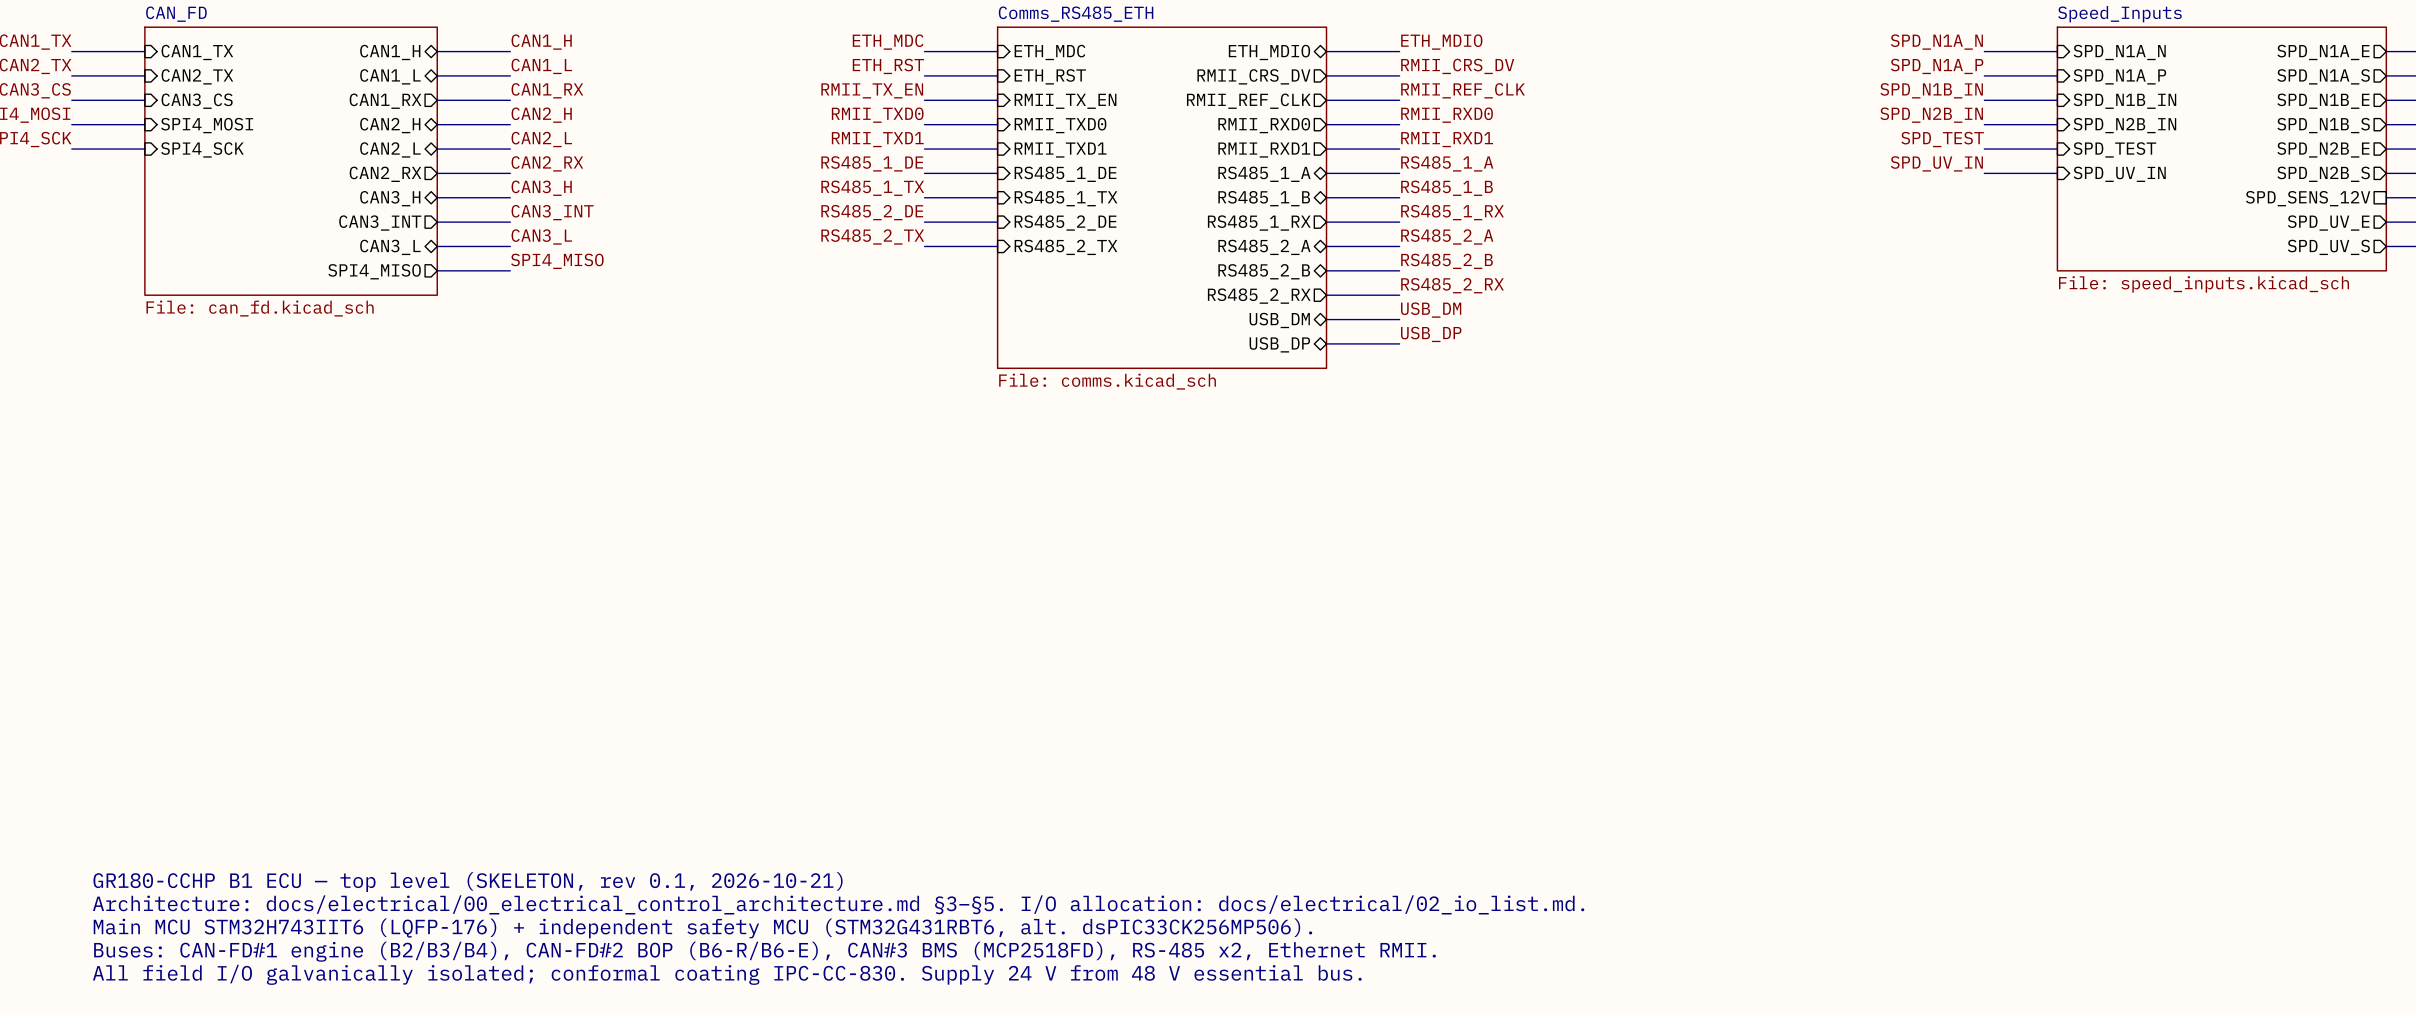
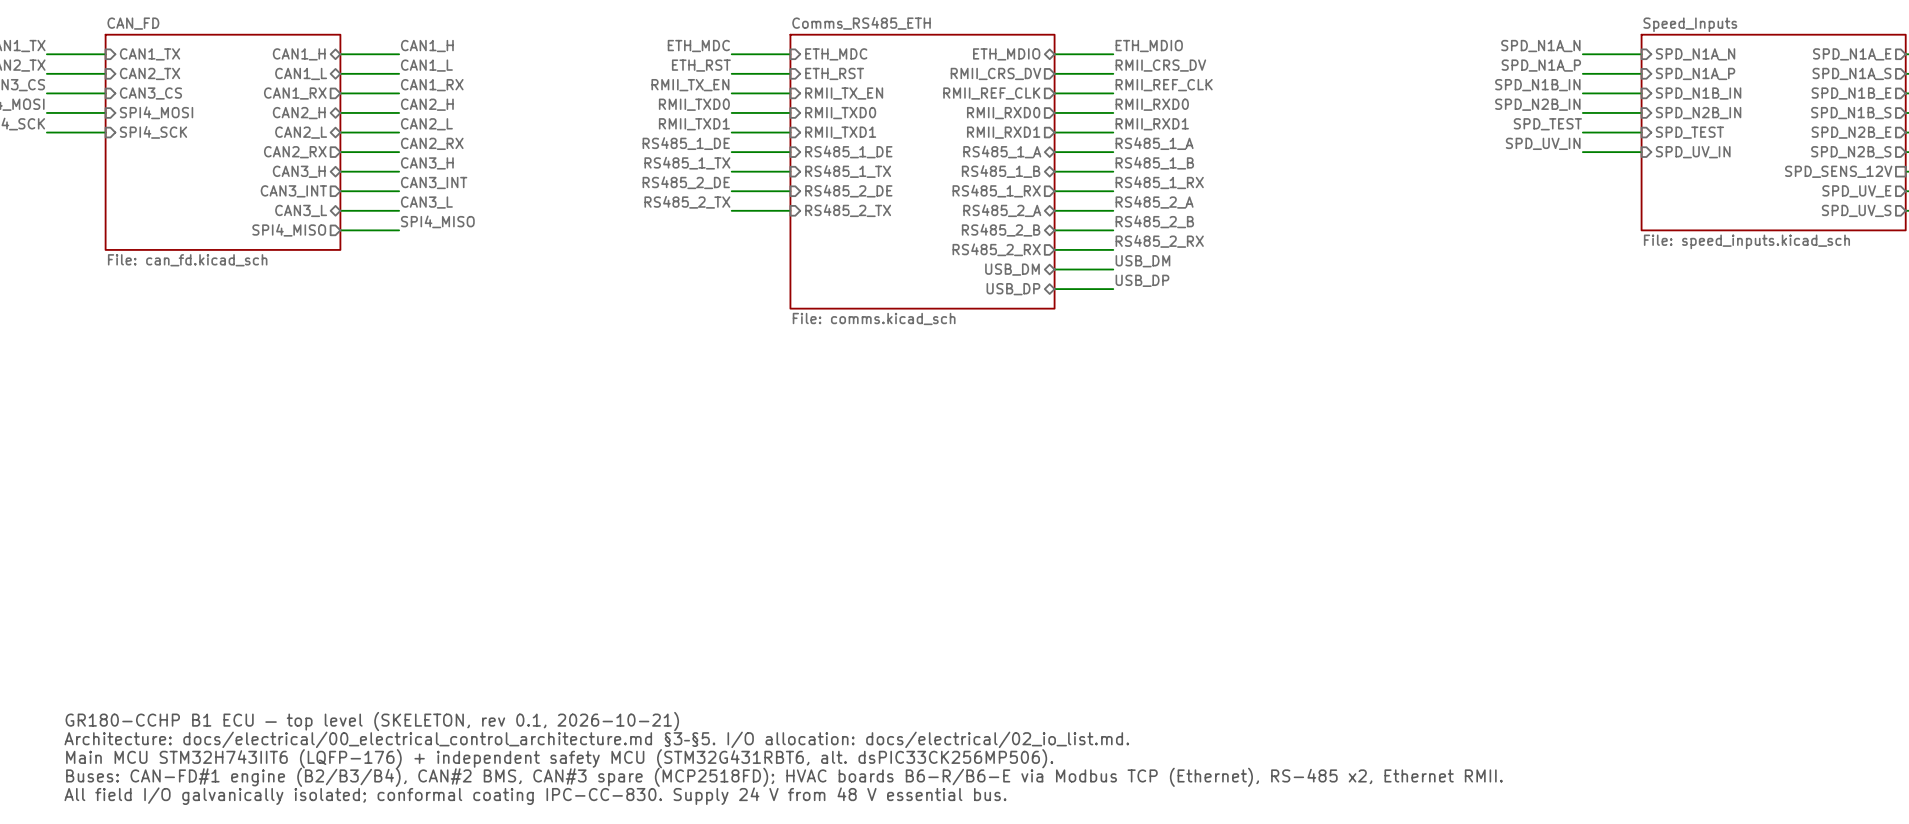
text: Buses: CAN-FD#1 engine (B2/B3/B4), CAN-FD#2 BOP (B6-R/B6-E), CAN#3 BMS (MCP2518FD), RS-485 x2, Ethernet RMII. (764, 951) -> Buses: CAN-FD#1 engine (B2/B3/B4), CAN#2 BMS, CAN#3 spare (MCP2518FD); HVAC boards B6-R/B6-E via Modbus TCP (Ethernet), RS-485 x2, Ethernet RMII. (784, 777)

